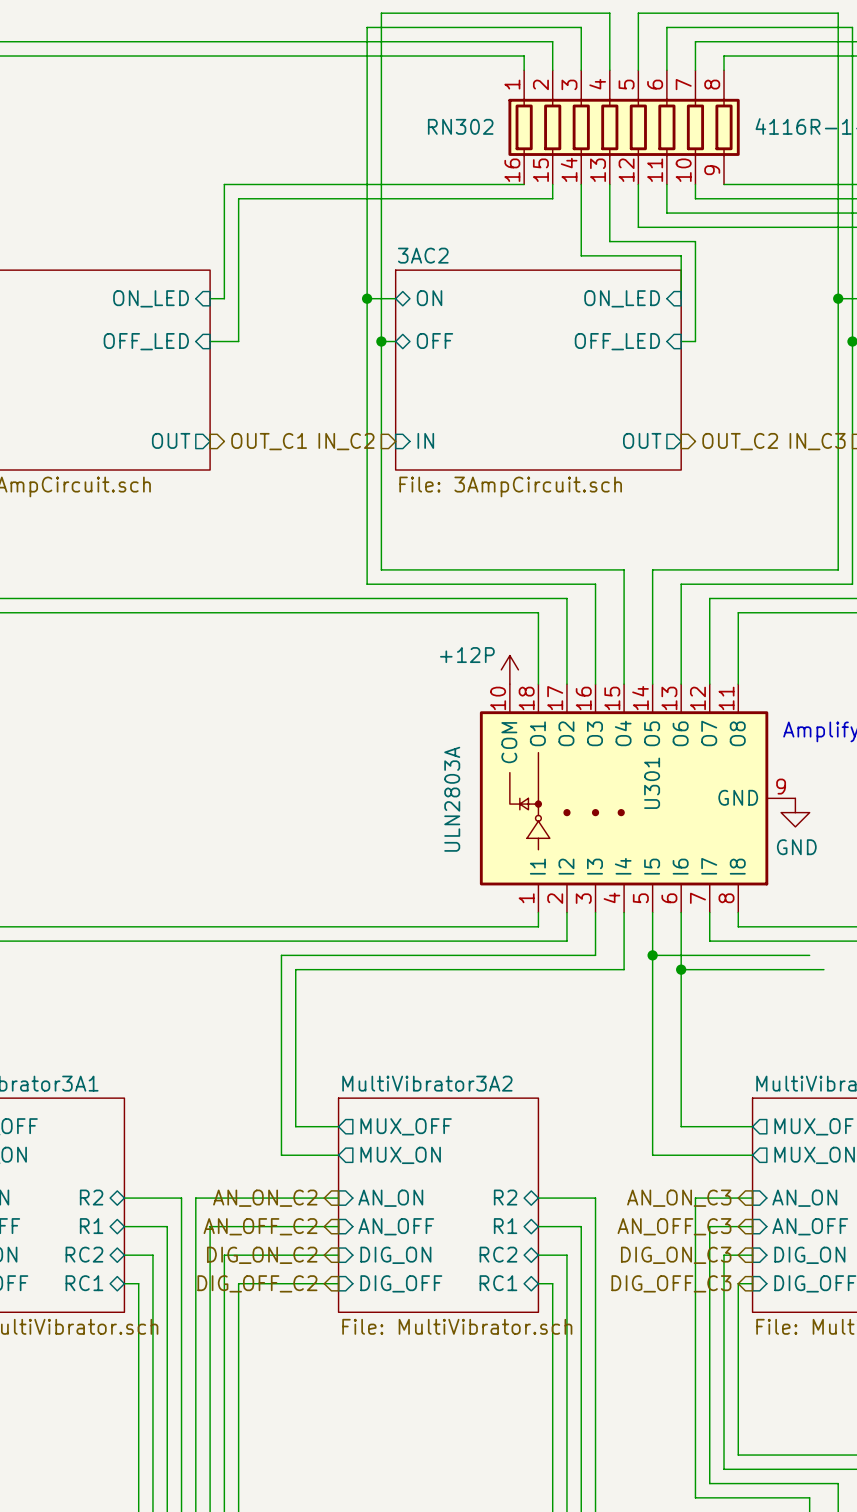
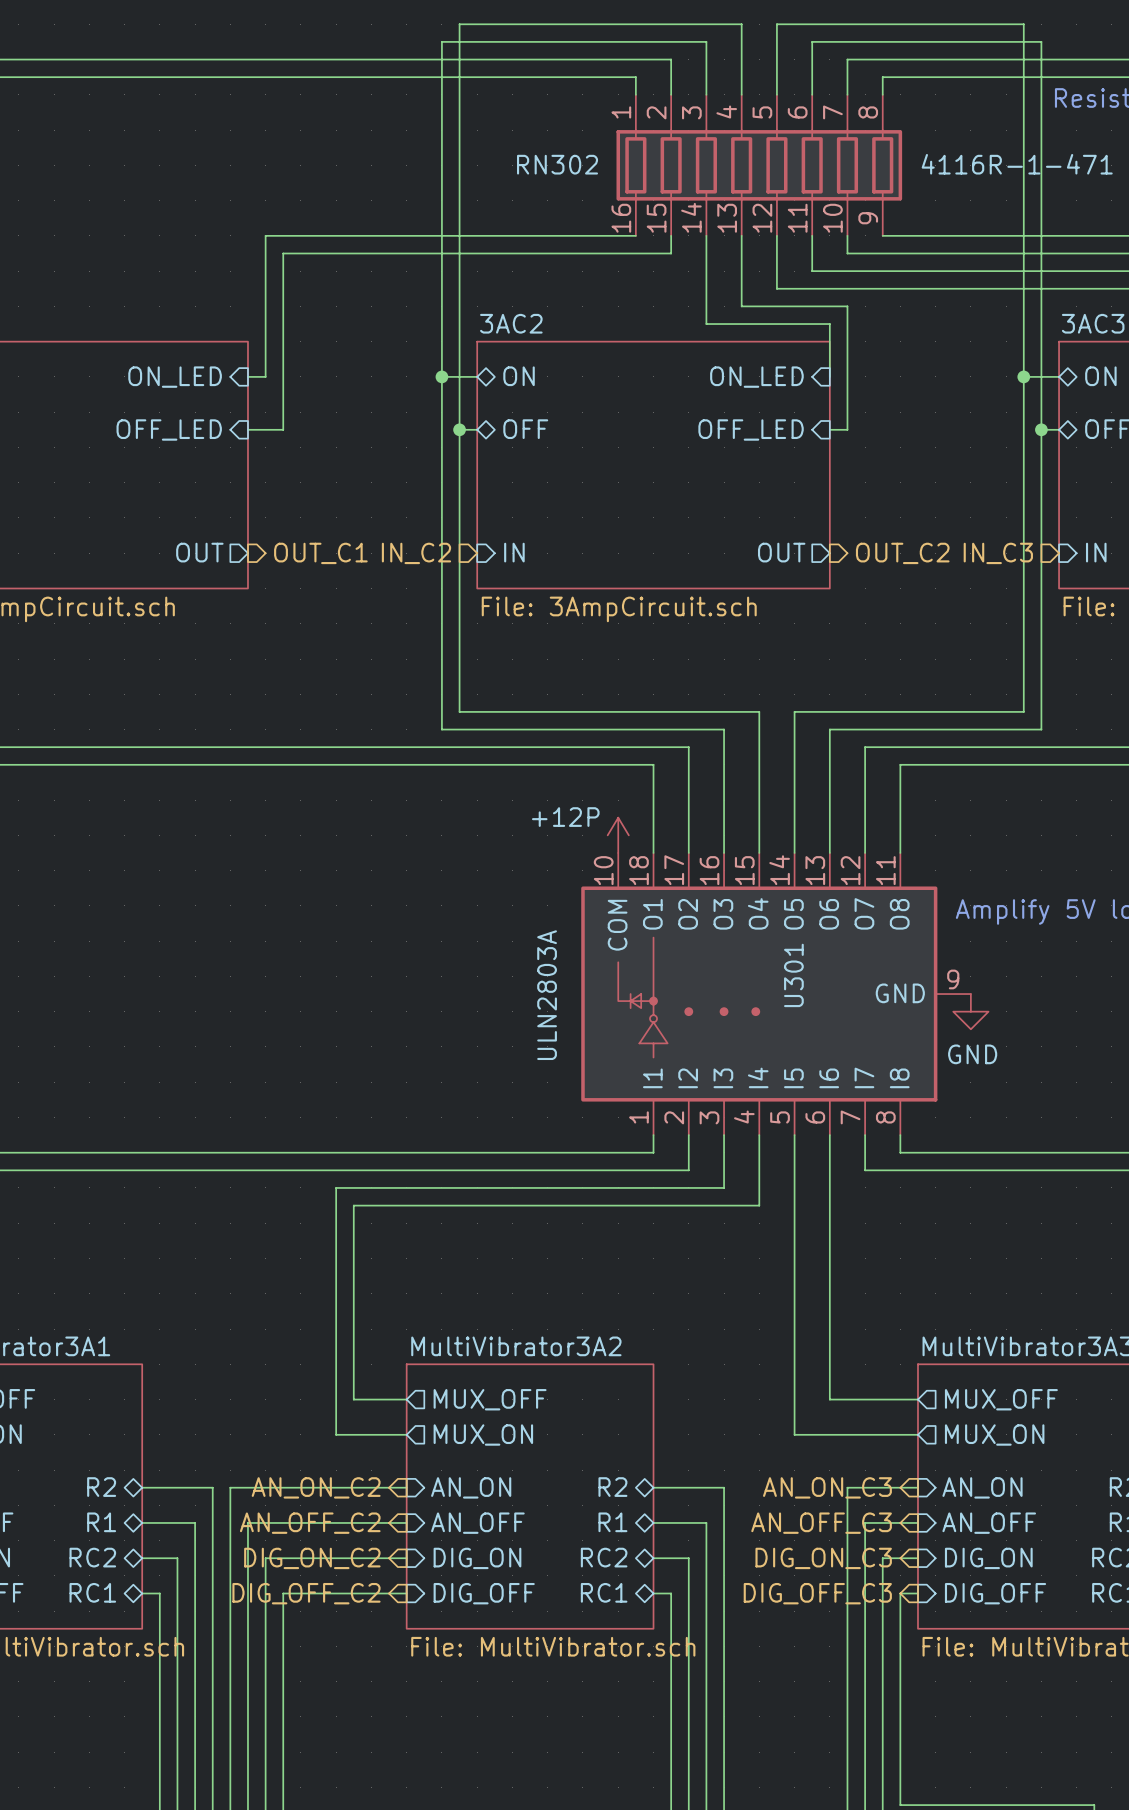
wire: (652, 955) (809, 955) -> none
junction: (652, 955) -> none
wire: (681, 969) (823, 969) -> none
junction: (681, 969) -> none

